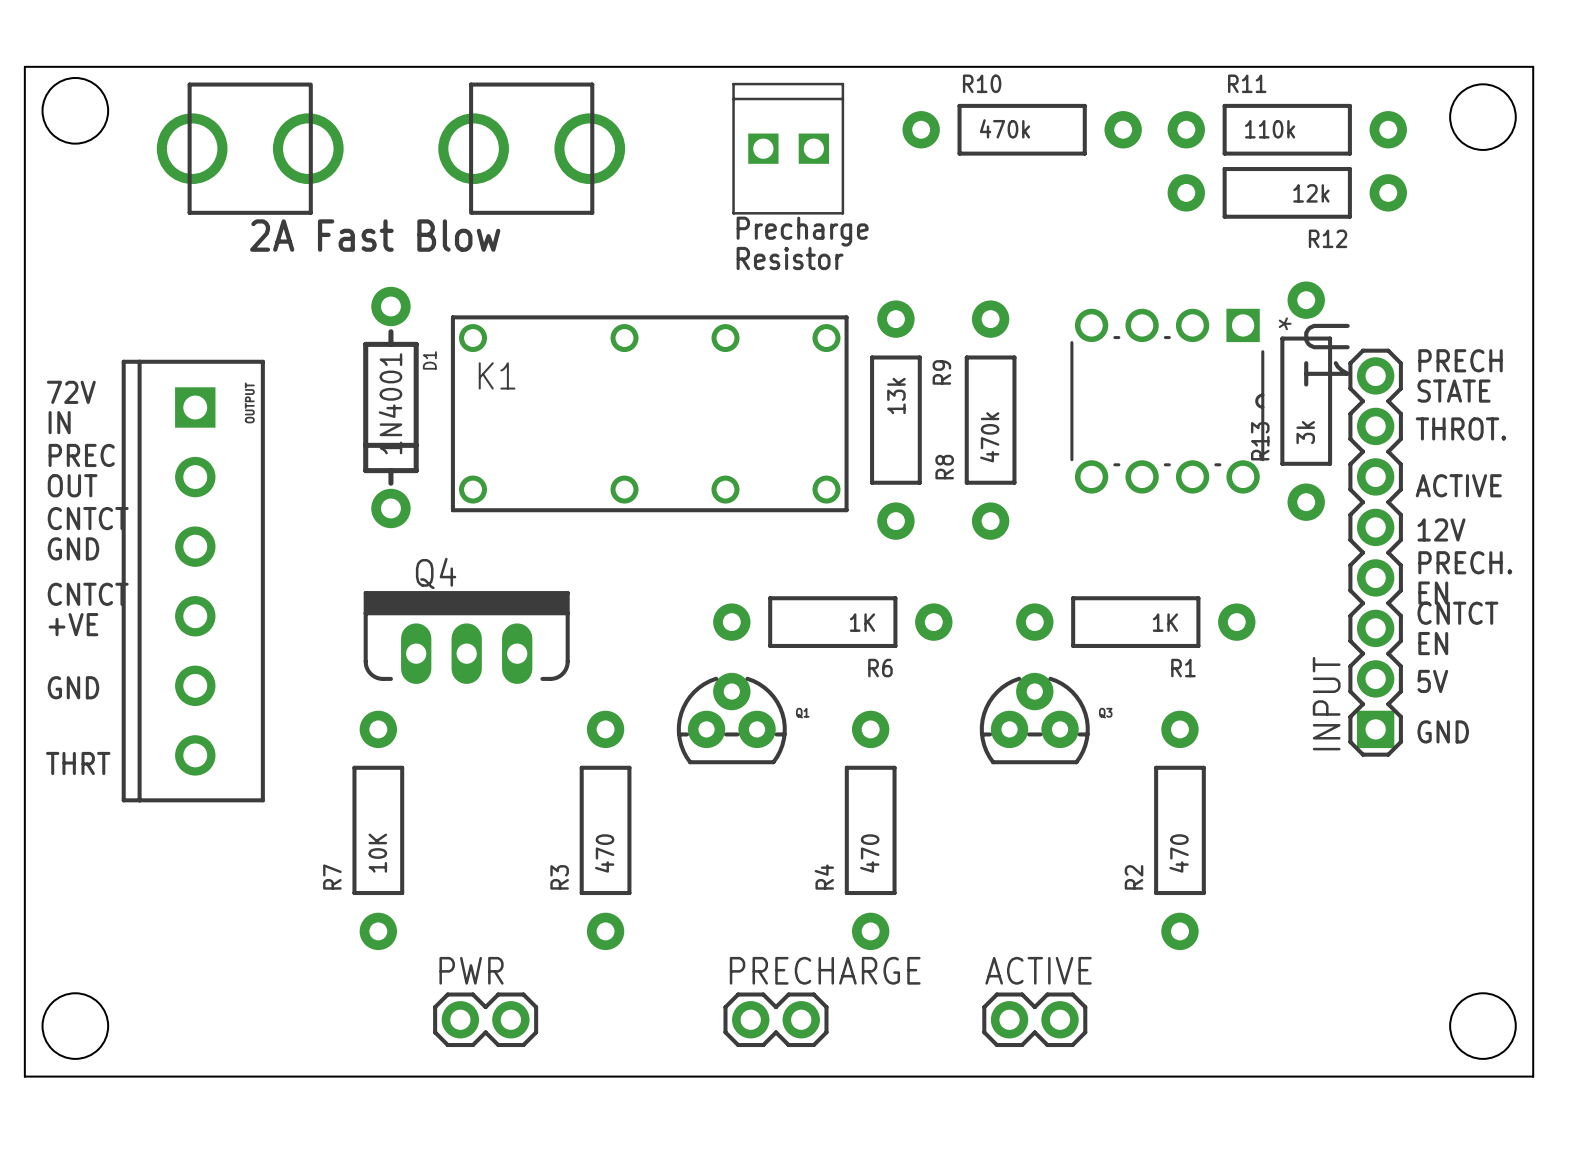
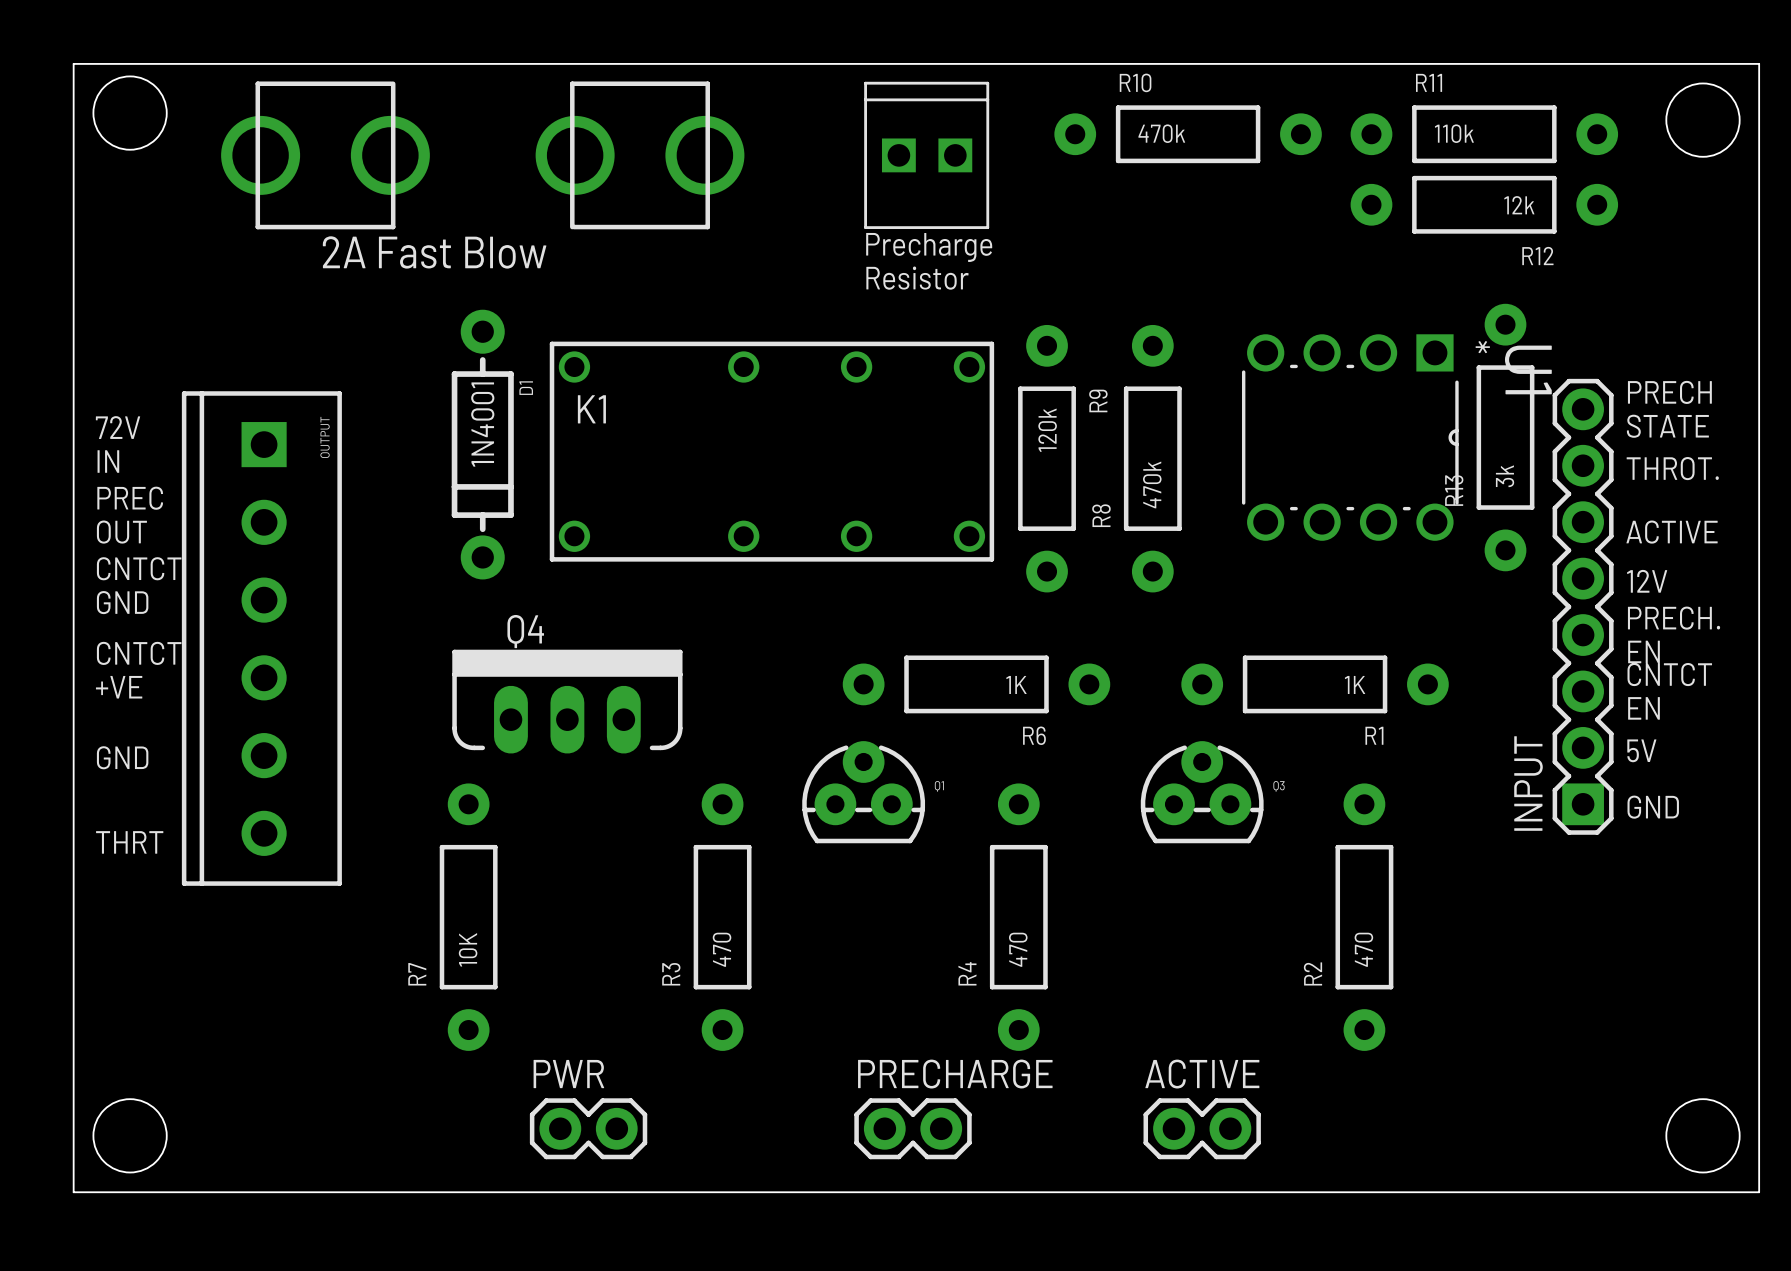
R9 value: 13k (896, 396) -> 120k (1047, 430)

